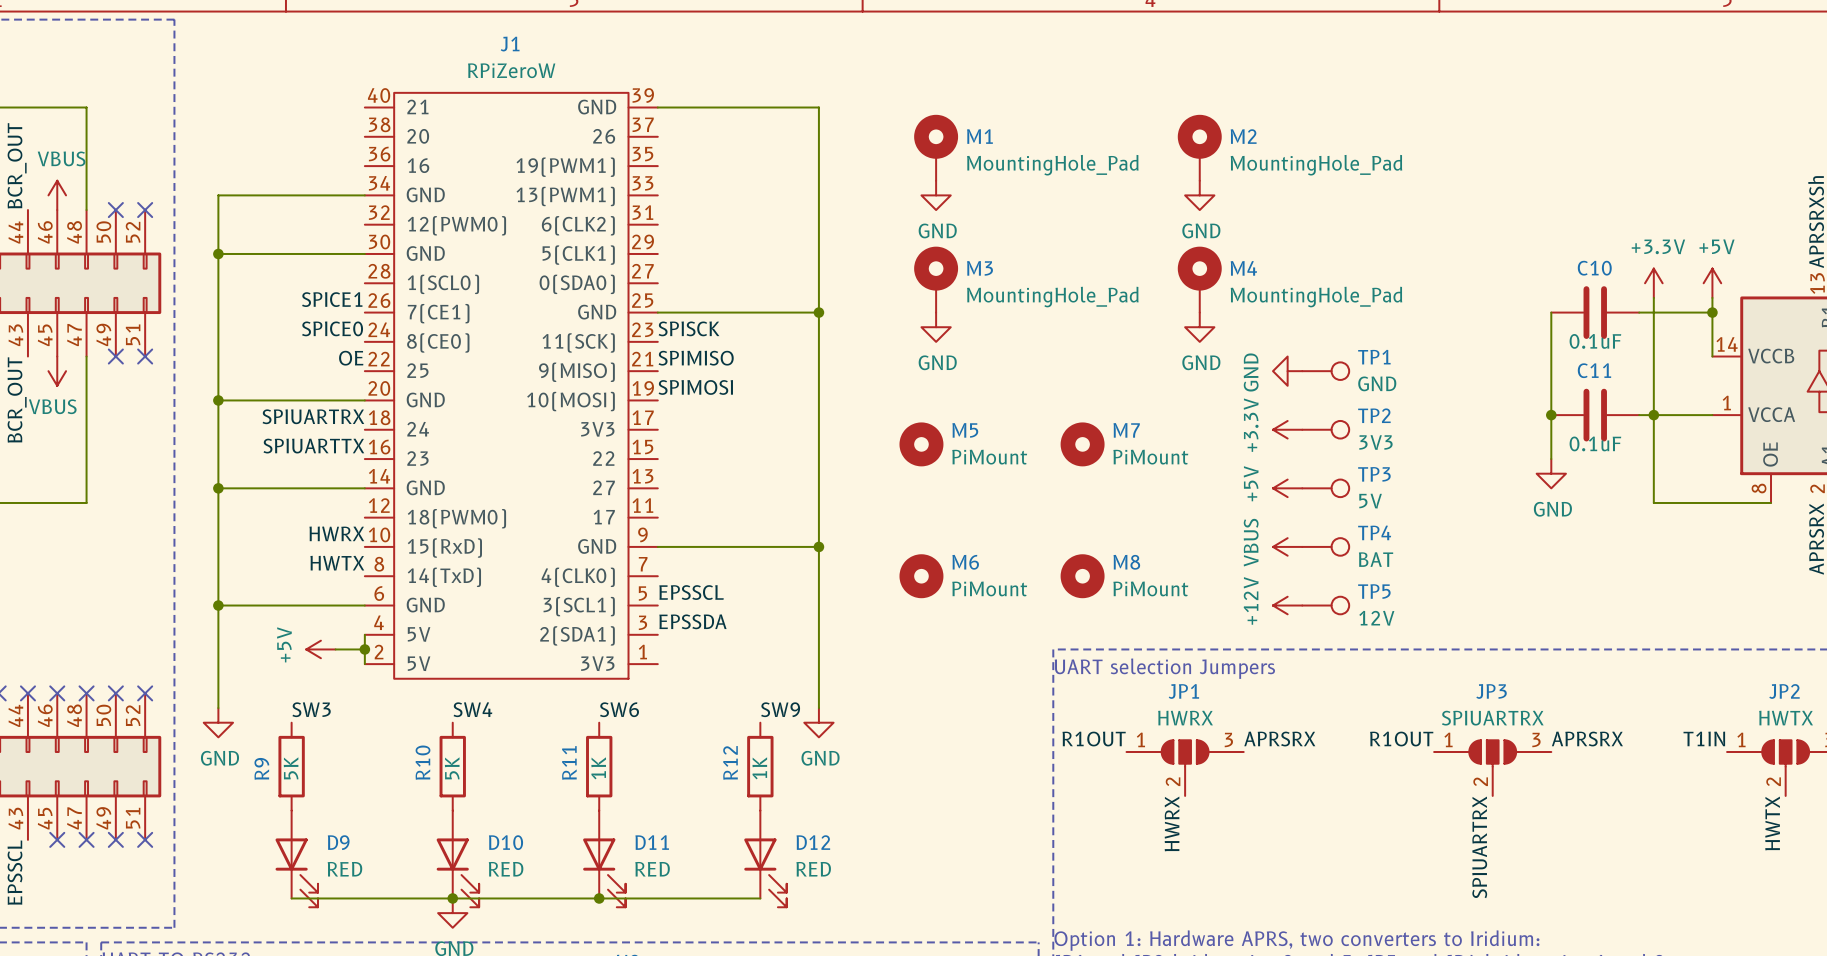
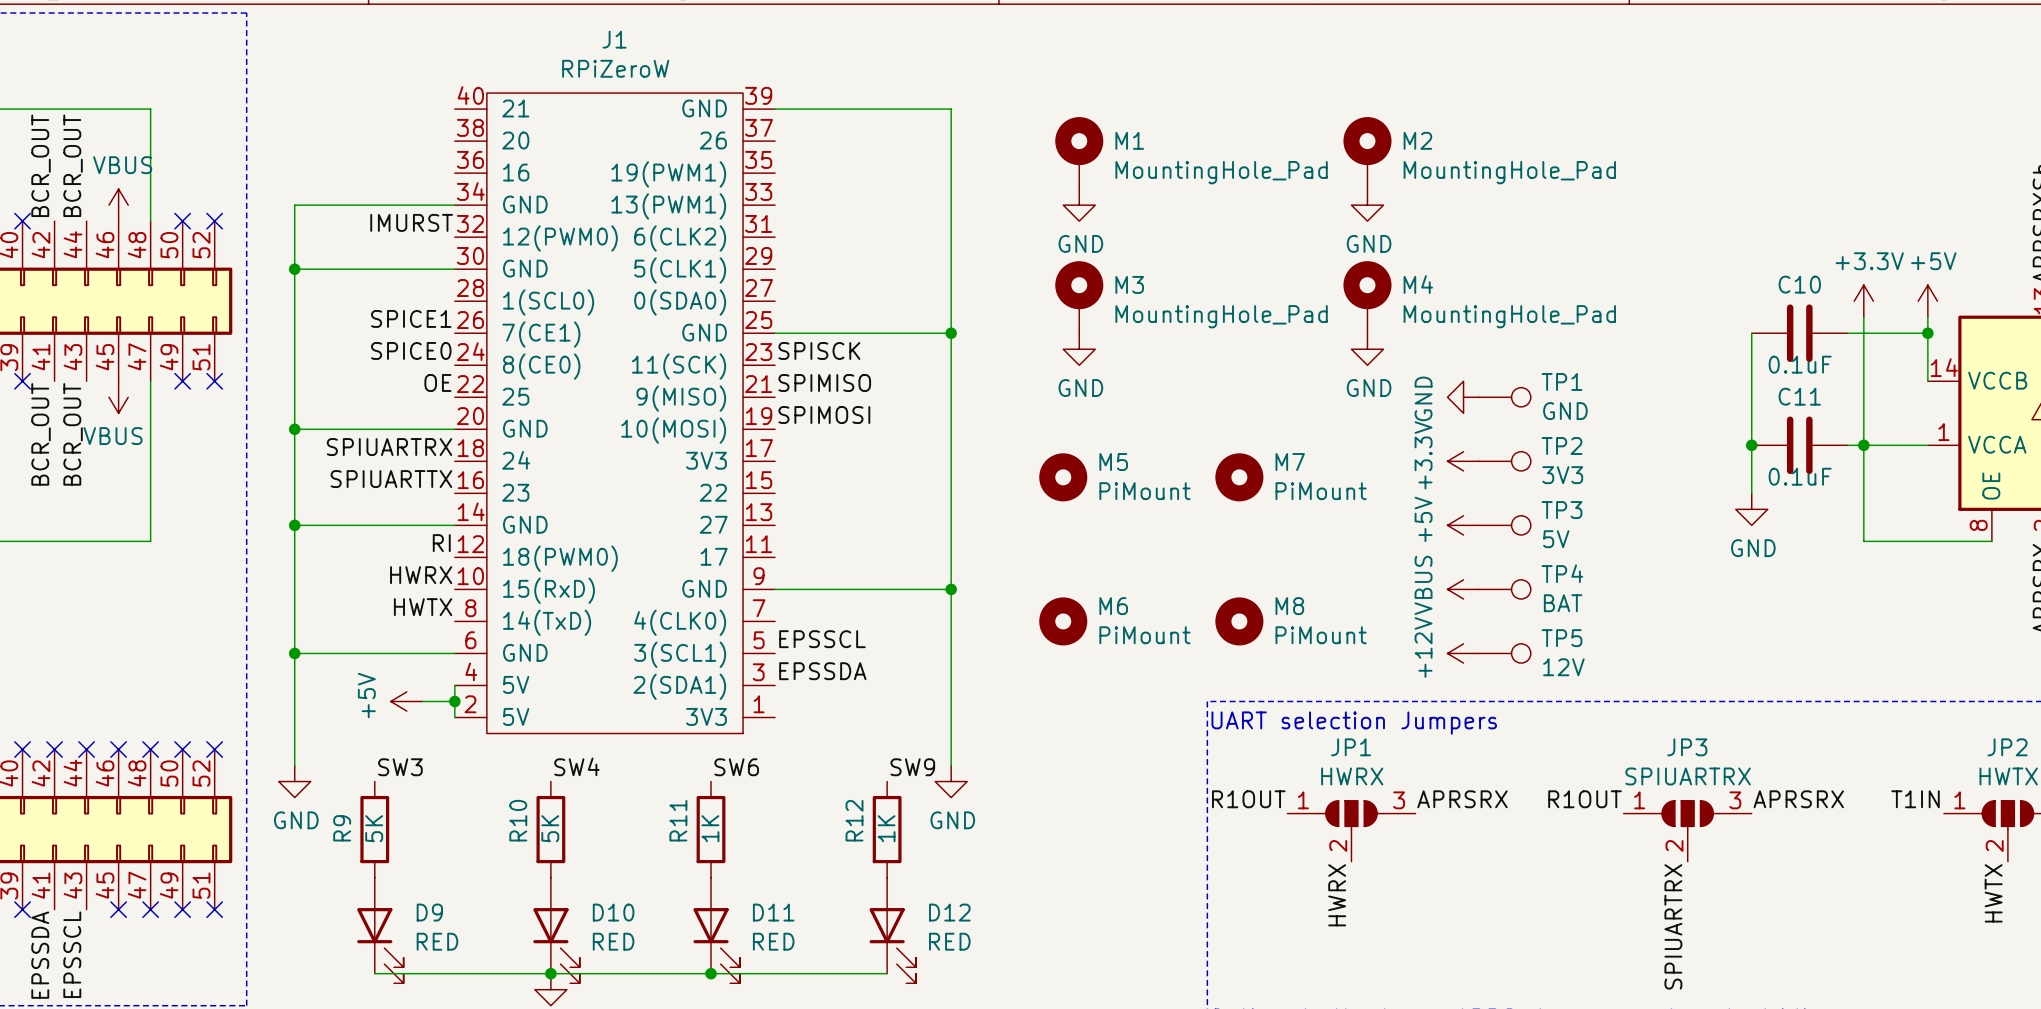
label: none -> IMURST (411, 222)
label: none -> RI (441, 543)

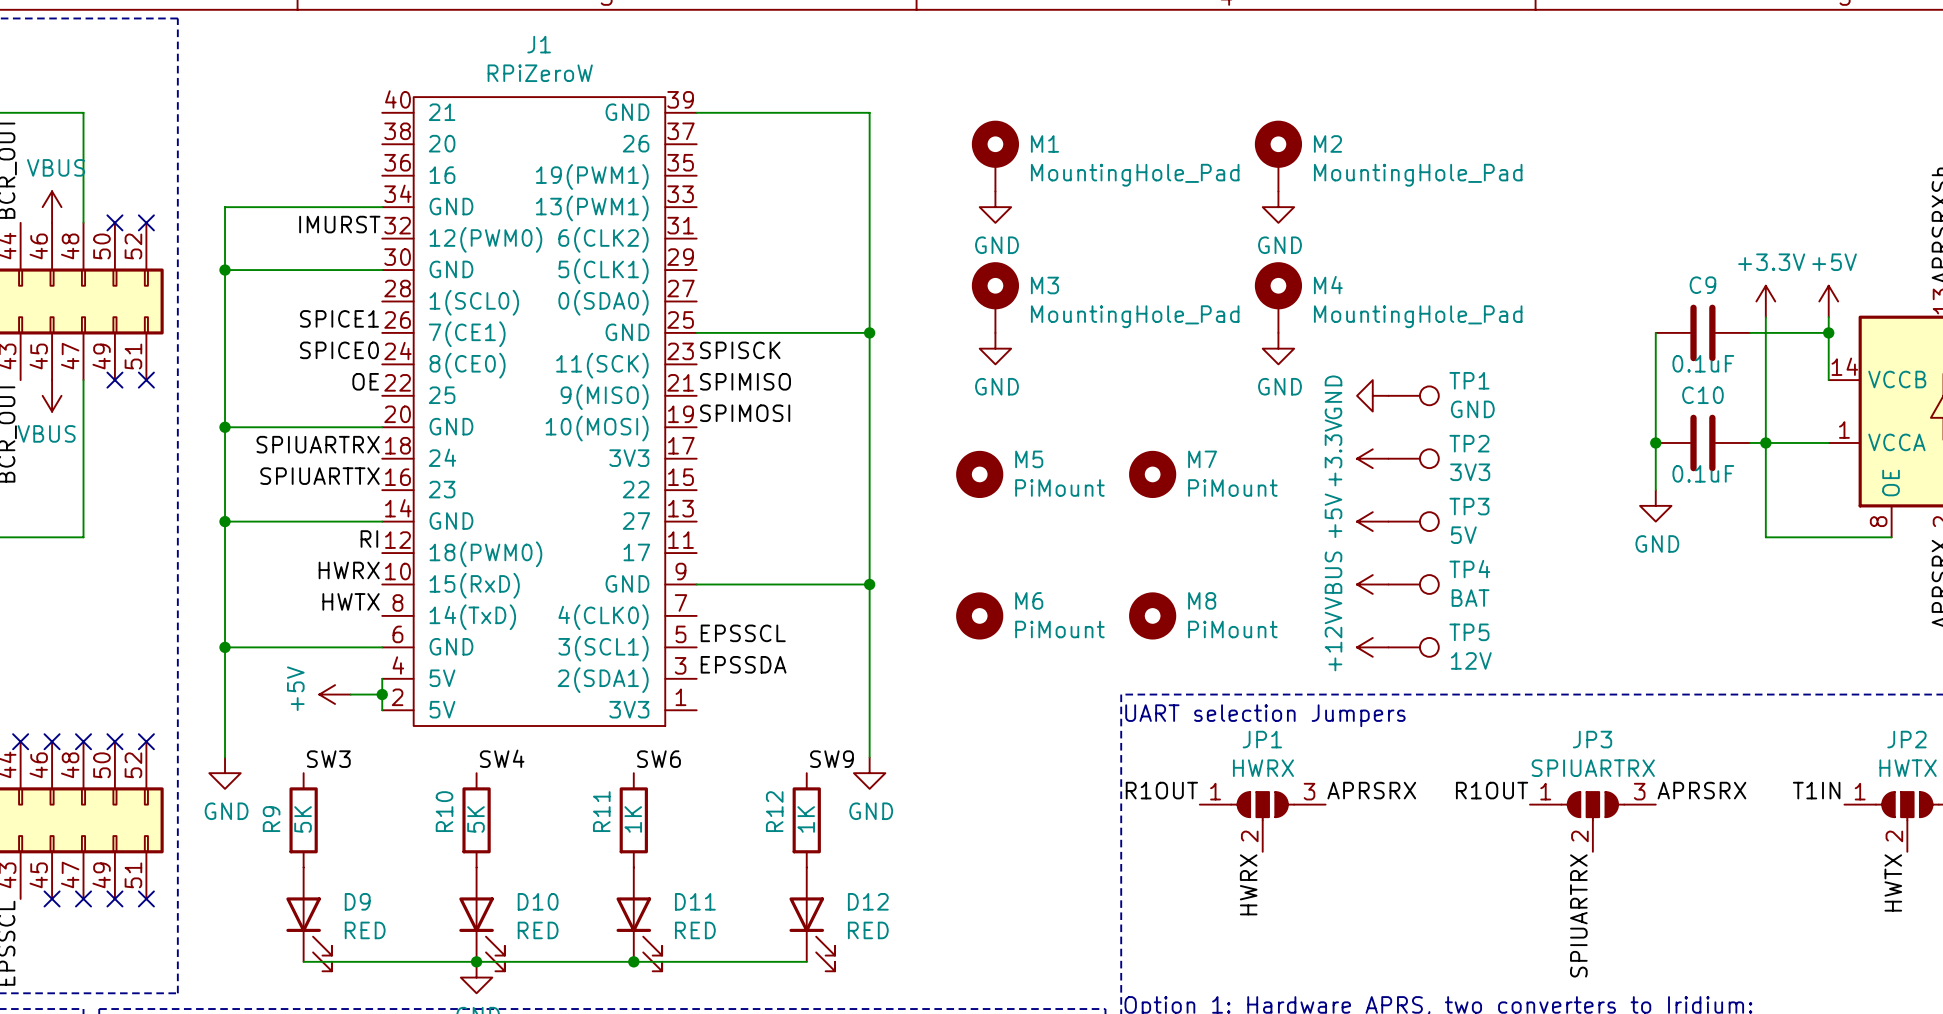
C10 name: C10 (1799, 284) -> C9 (1702, 285)
C11 name: C11 (1799, 396) -> C10 (1702, 395)

